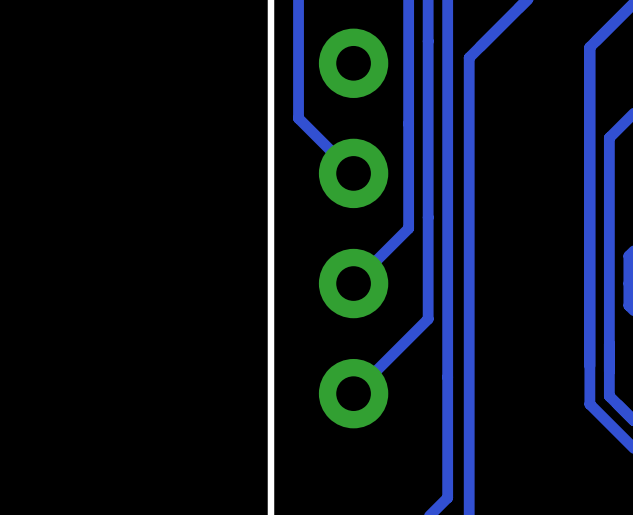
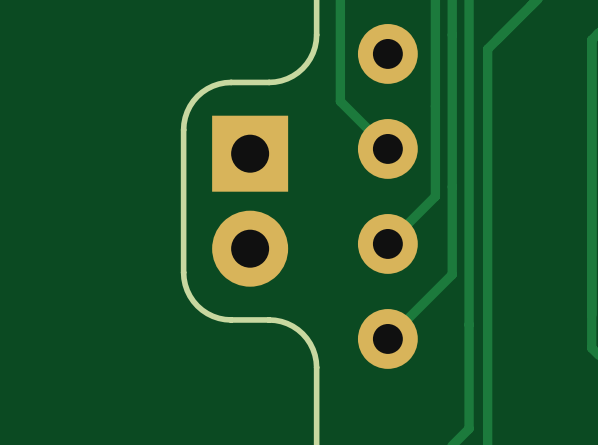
board edge: (270, 41) (270, 426) -> (316, 34) (315, 47) (310, 58) (298, 72) (287, 78) (275, 82) (224, 82) (207, 88) (197, 96) (189, 106) (185, 117) (183, 129) (183, 272) (185, 284) (189, 296) (202, 310) (218, 318) (275, 320) (292, 326) (302, 333) (310, 343) (315, 355) (316, 367)
part: none -> (250, 201)

